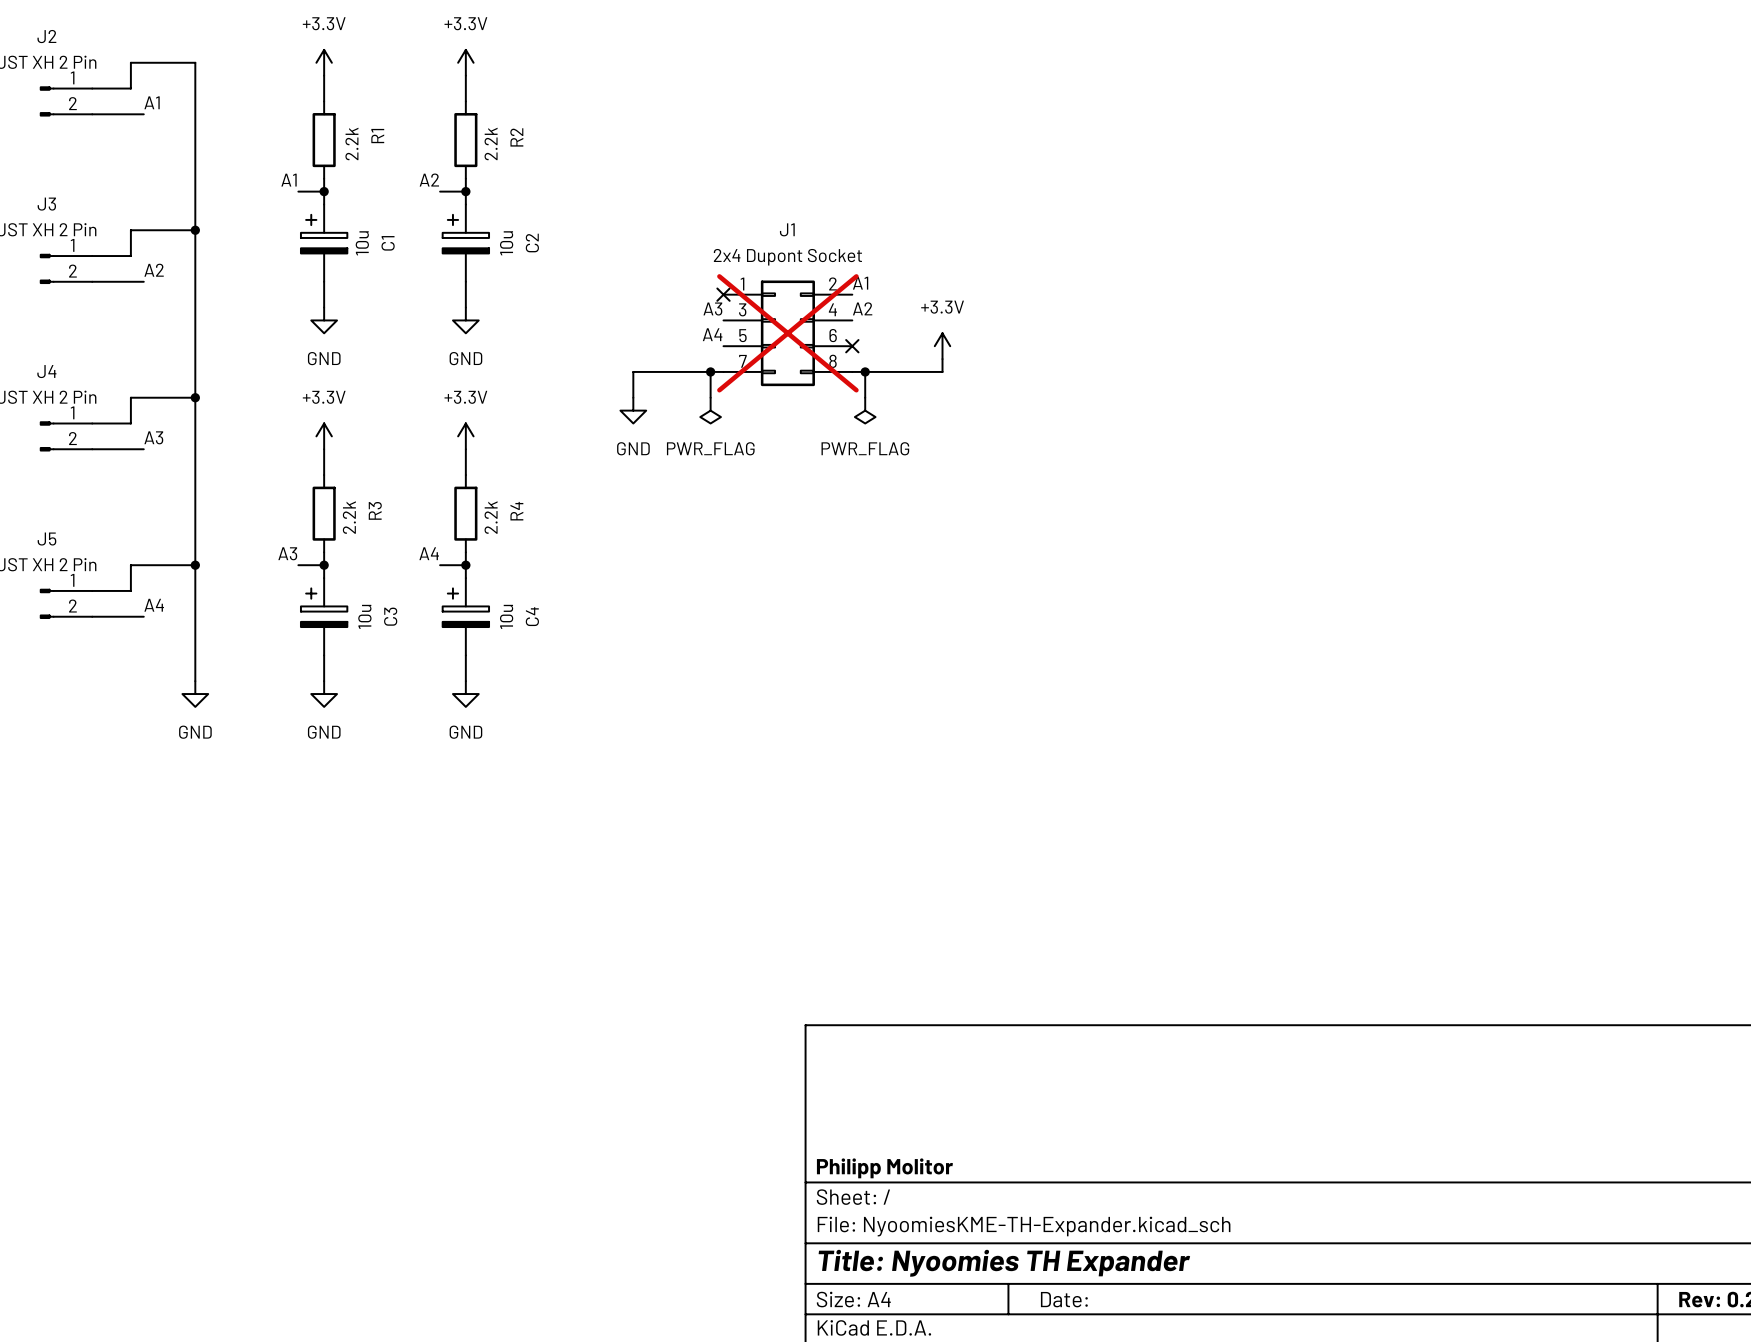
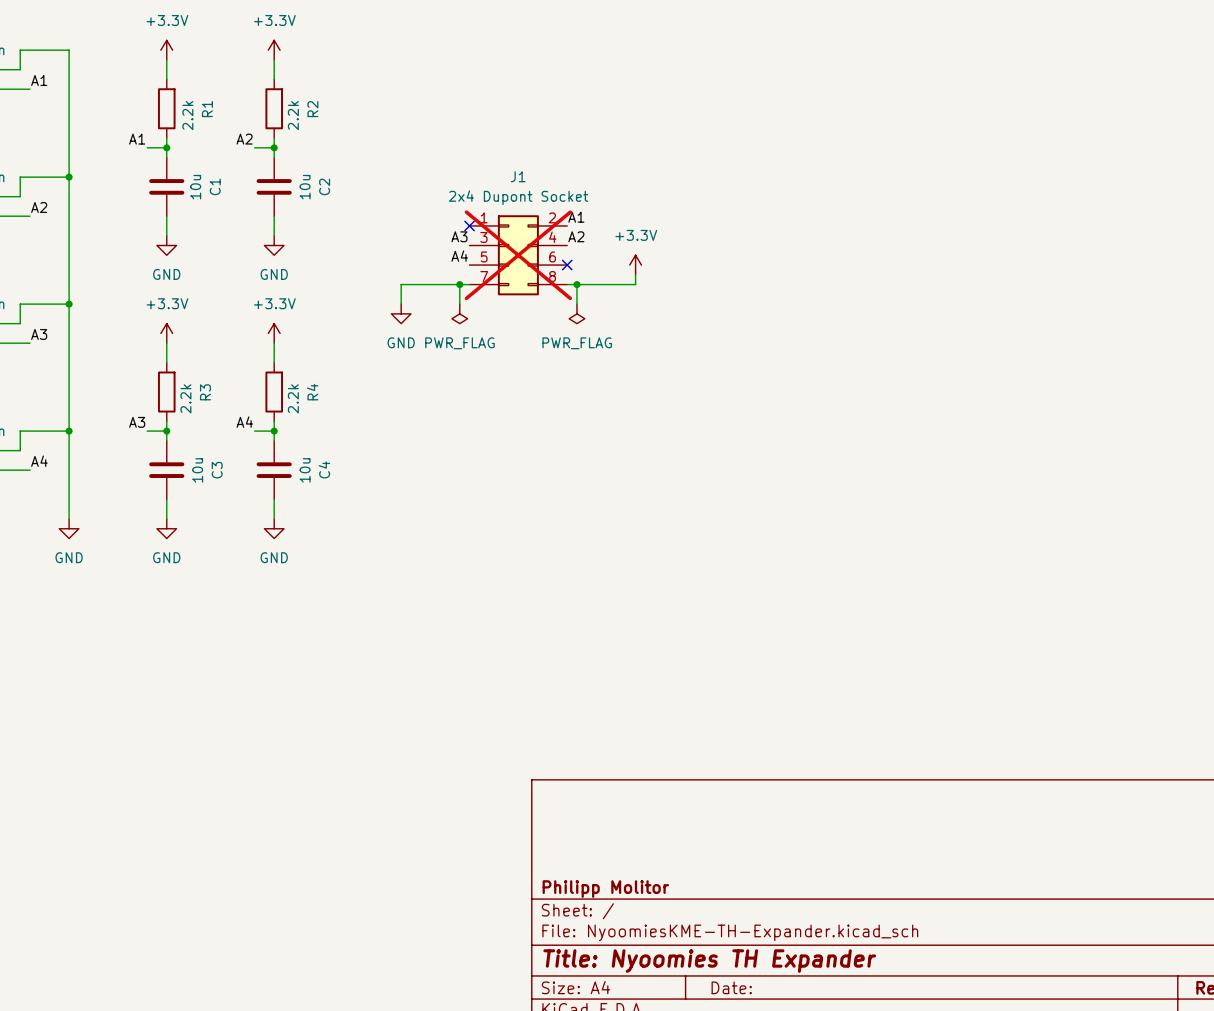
C1 symbol: [300, 204, 348, 282] -> [149, 157, 185, 217]
C2 symbol: [442, 204, 490, 282] -> [256, 157, 292, 217]
C3 symbol: [300, 578, 348, 656] -> [149, 440, 185, 500]
C4 symbol: [442, 578, 490, 656] -> [256, 440, 292, 500]

